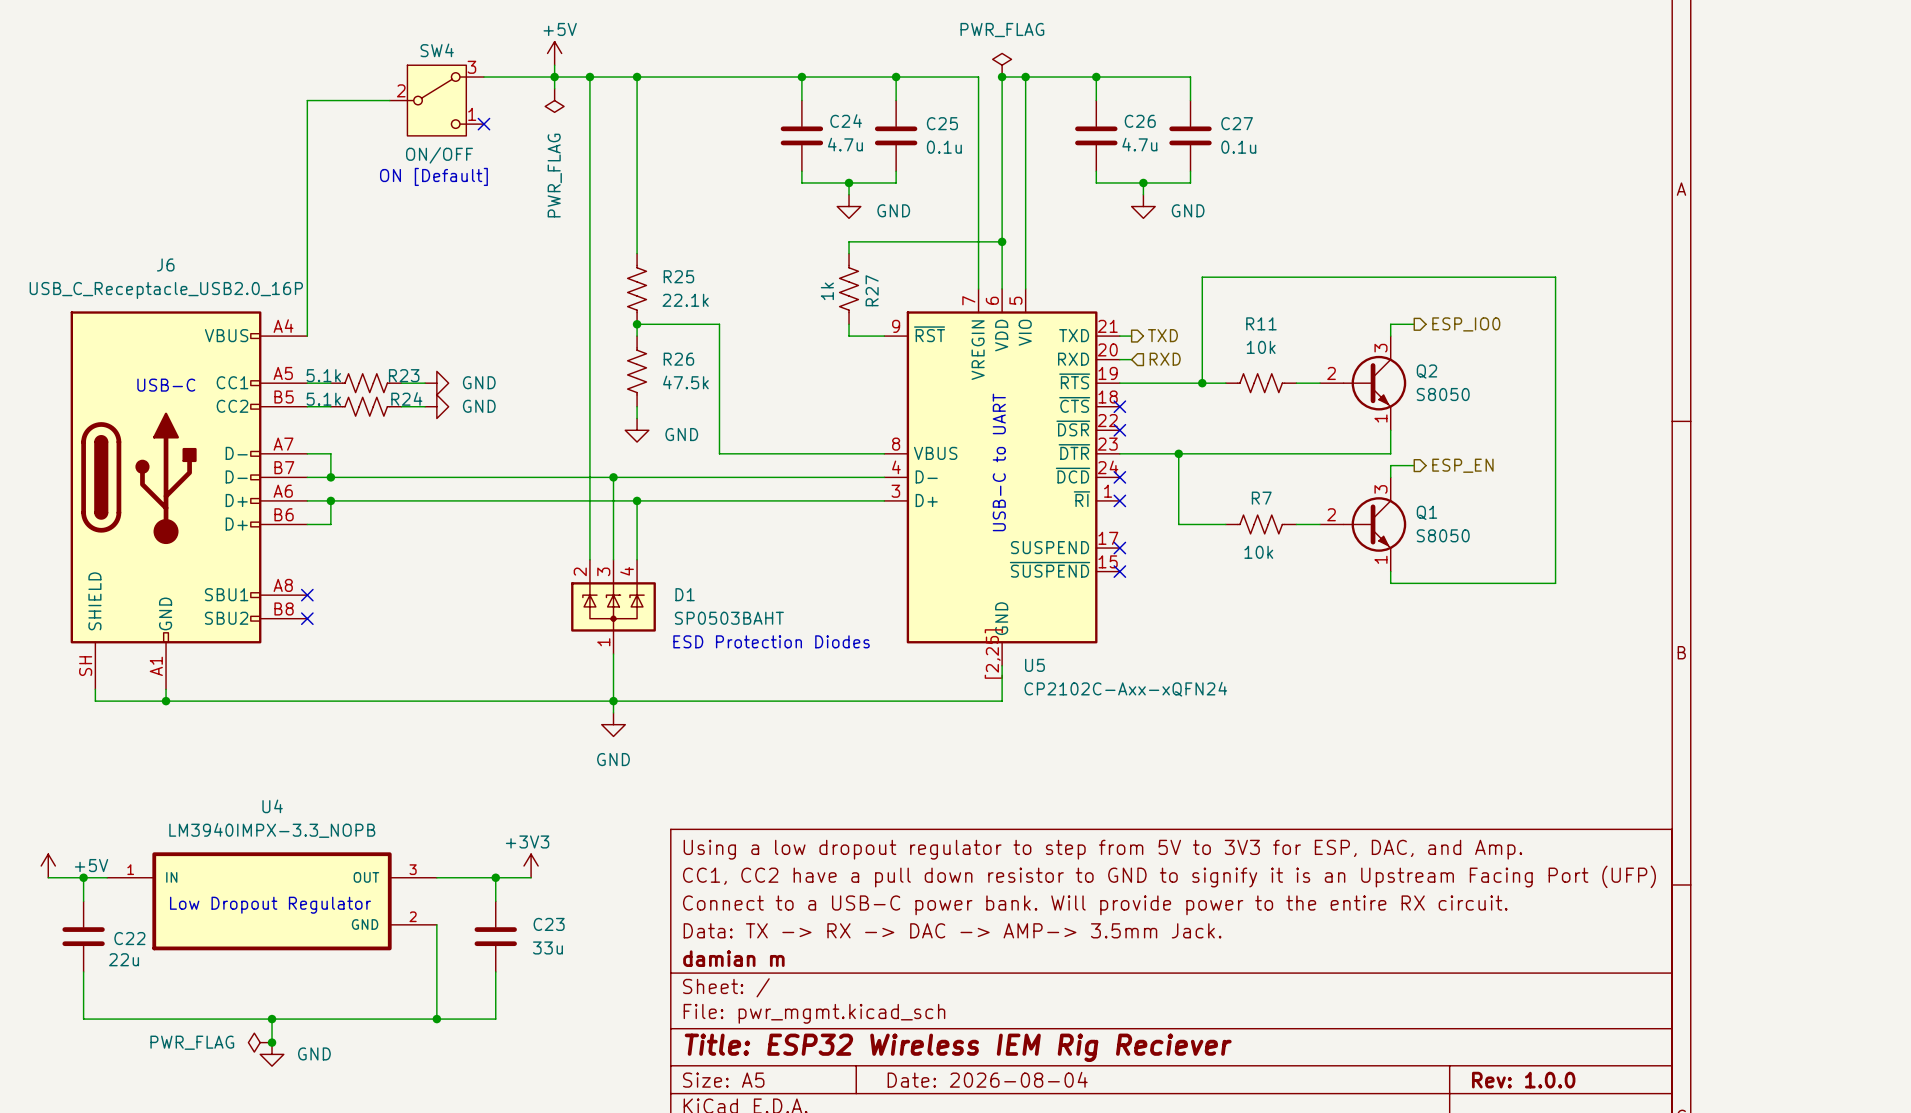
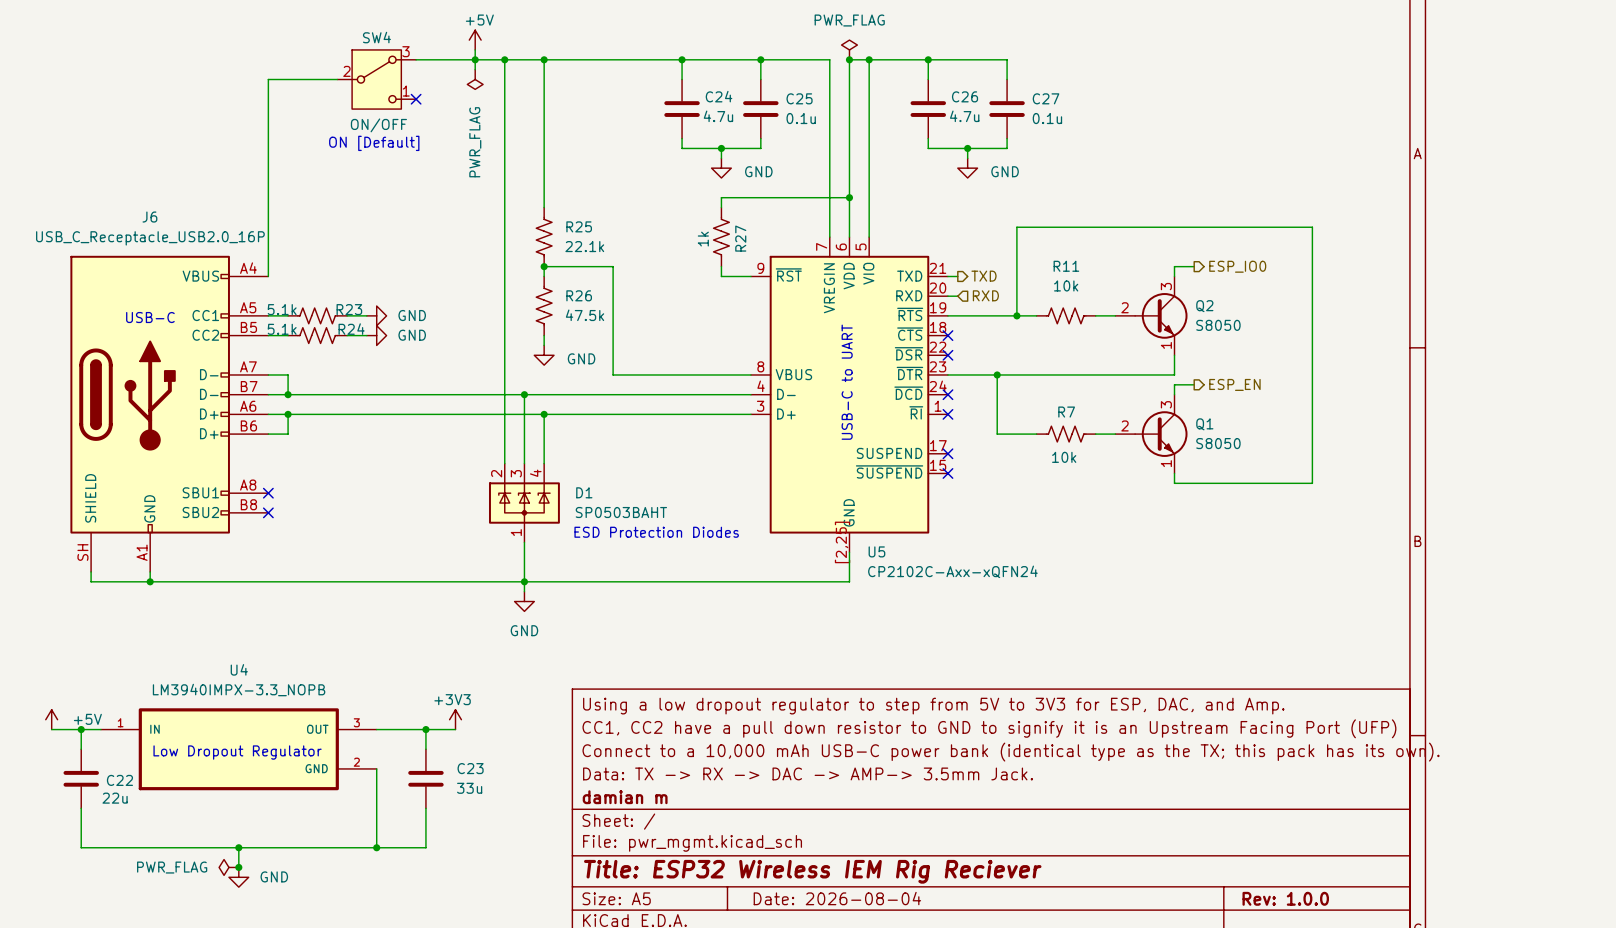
title block: Connect to a USB-C power bank. Will provide power to the entire RX circuit. (1095, 905) -> Connect to a 10,000 mAh USB-C power bank (identical type as the TX; this pack has its own). (1011, 752)

